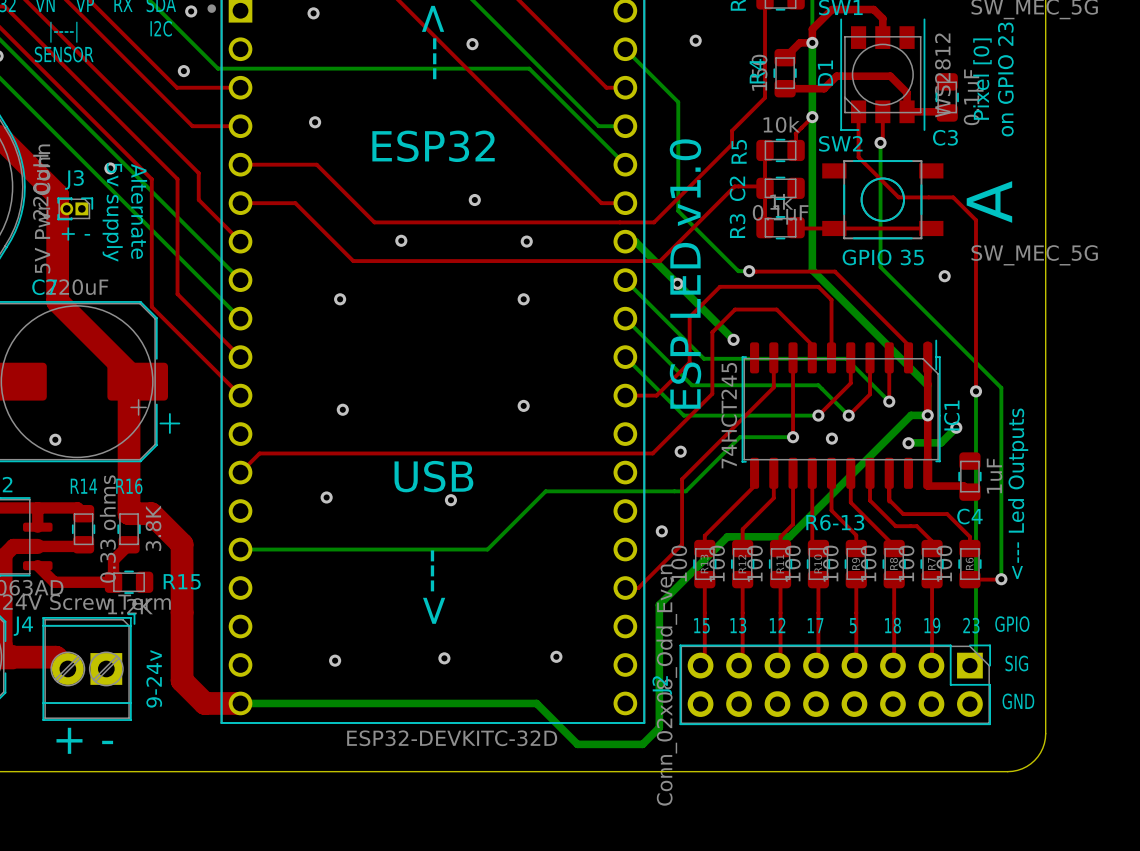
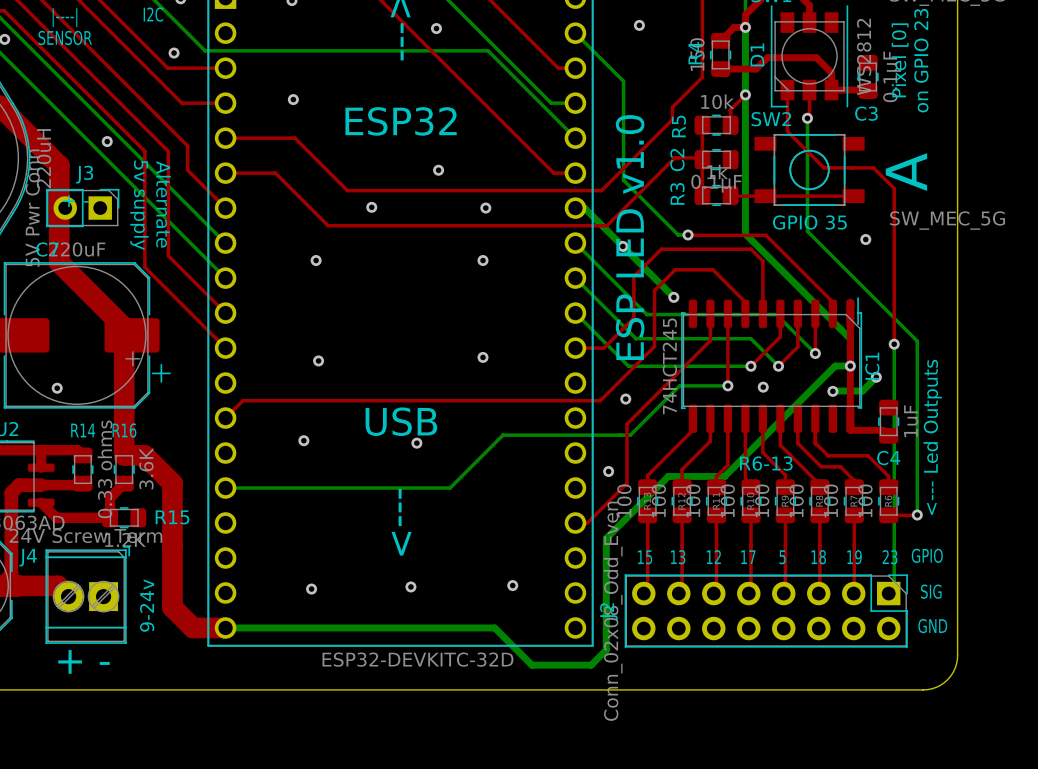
J3 footprint: [57, 197, 94, 221] -> [46, 188, 120, 228]
text position: Alternate (139, 211) -> Alternate (163, 204)
text position: 5v supply (112, 212) -> 5v supply (139, 205)
R16 value: 3.8K (153, 528) -> 3.6K (146, 468)

